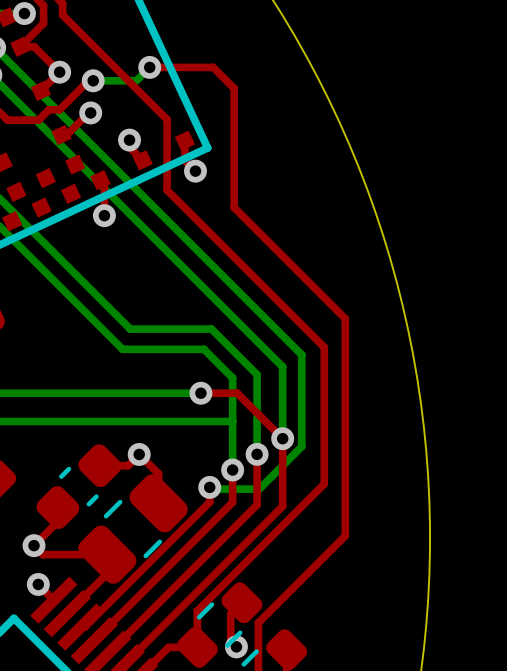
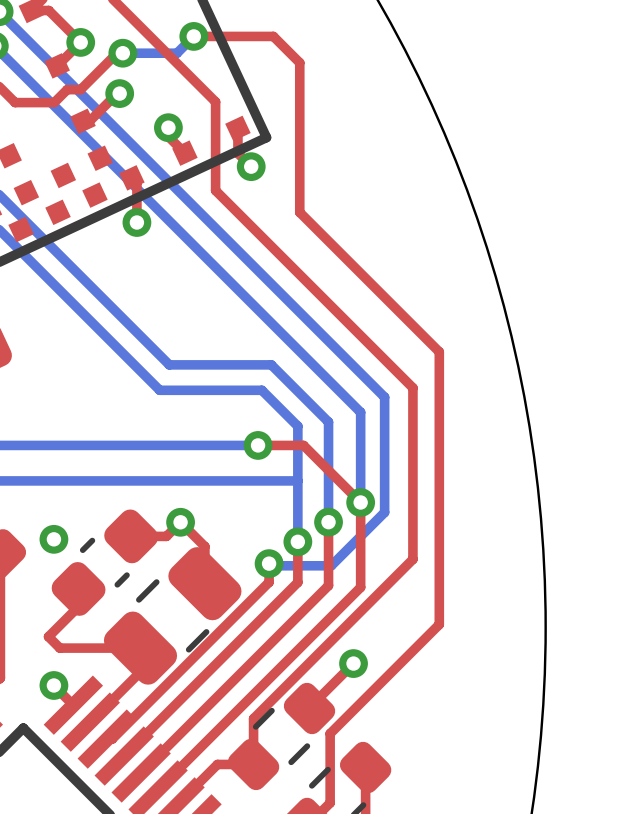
via position: (34, 545) -> (53, 539)
top track: (241, 602) (230, 614) (230, 641) (236, 646) -> (309, 707) (353, 663)
via position: (236, 646) -> (353, 663)

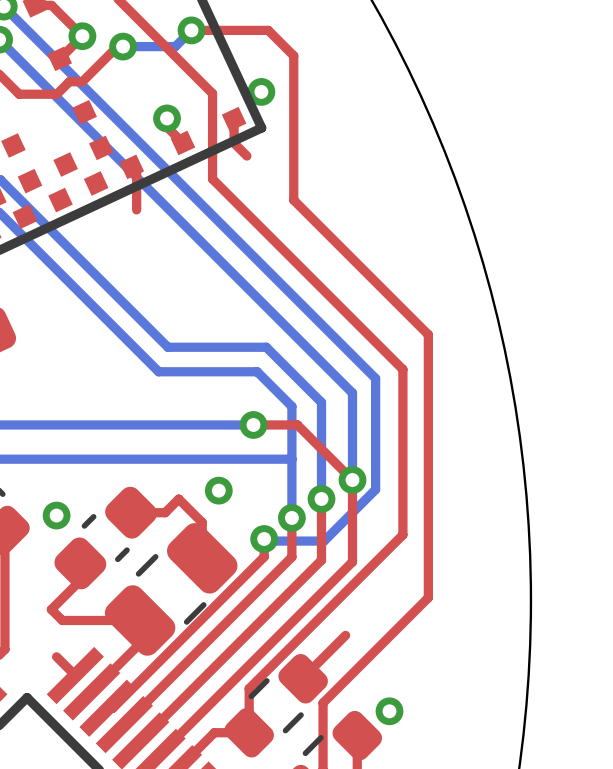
top track: (119, 93) (114, 96) (89, 121) (83, 121) -> none
via: (119, 93) -> none
via position: (251, 166) -> (261, 91)
via: (136, 222) -> none
via position: (180, 522) -> (218, 490)
via position: (353, 663) -> (389, 711)
via: (53, 685) -> none

